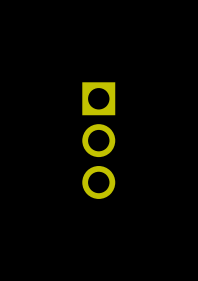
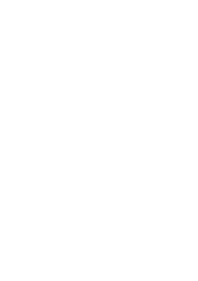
part: (98, 140) -> none

